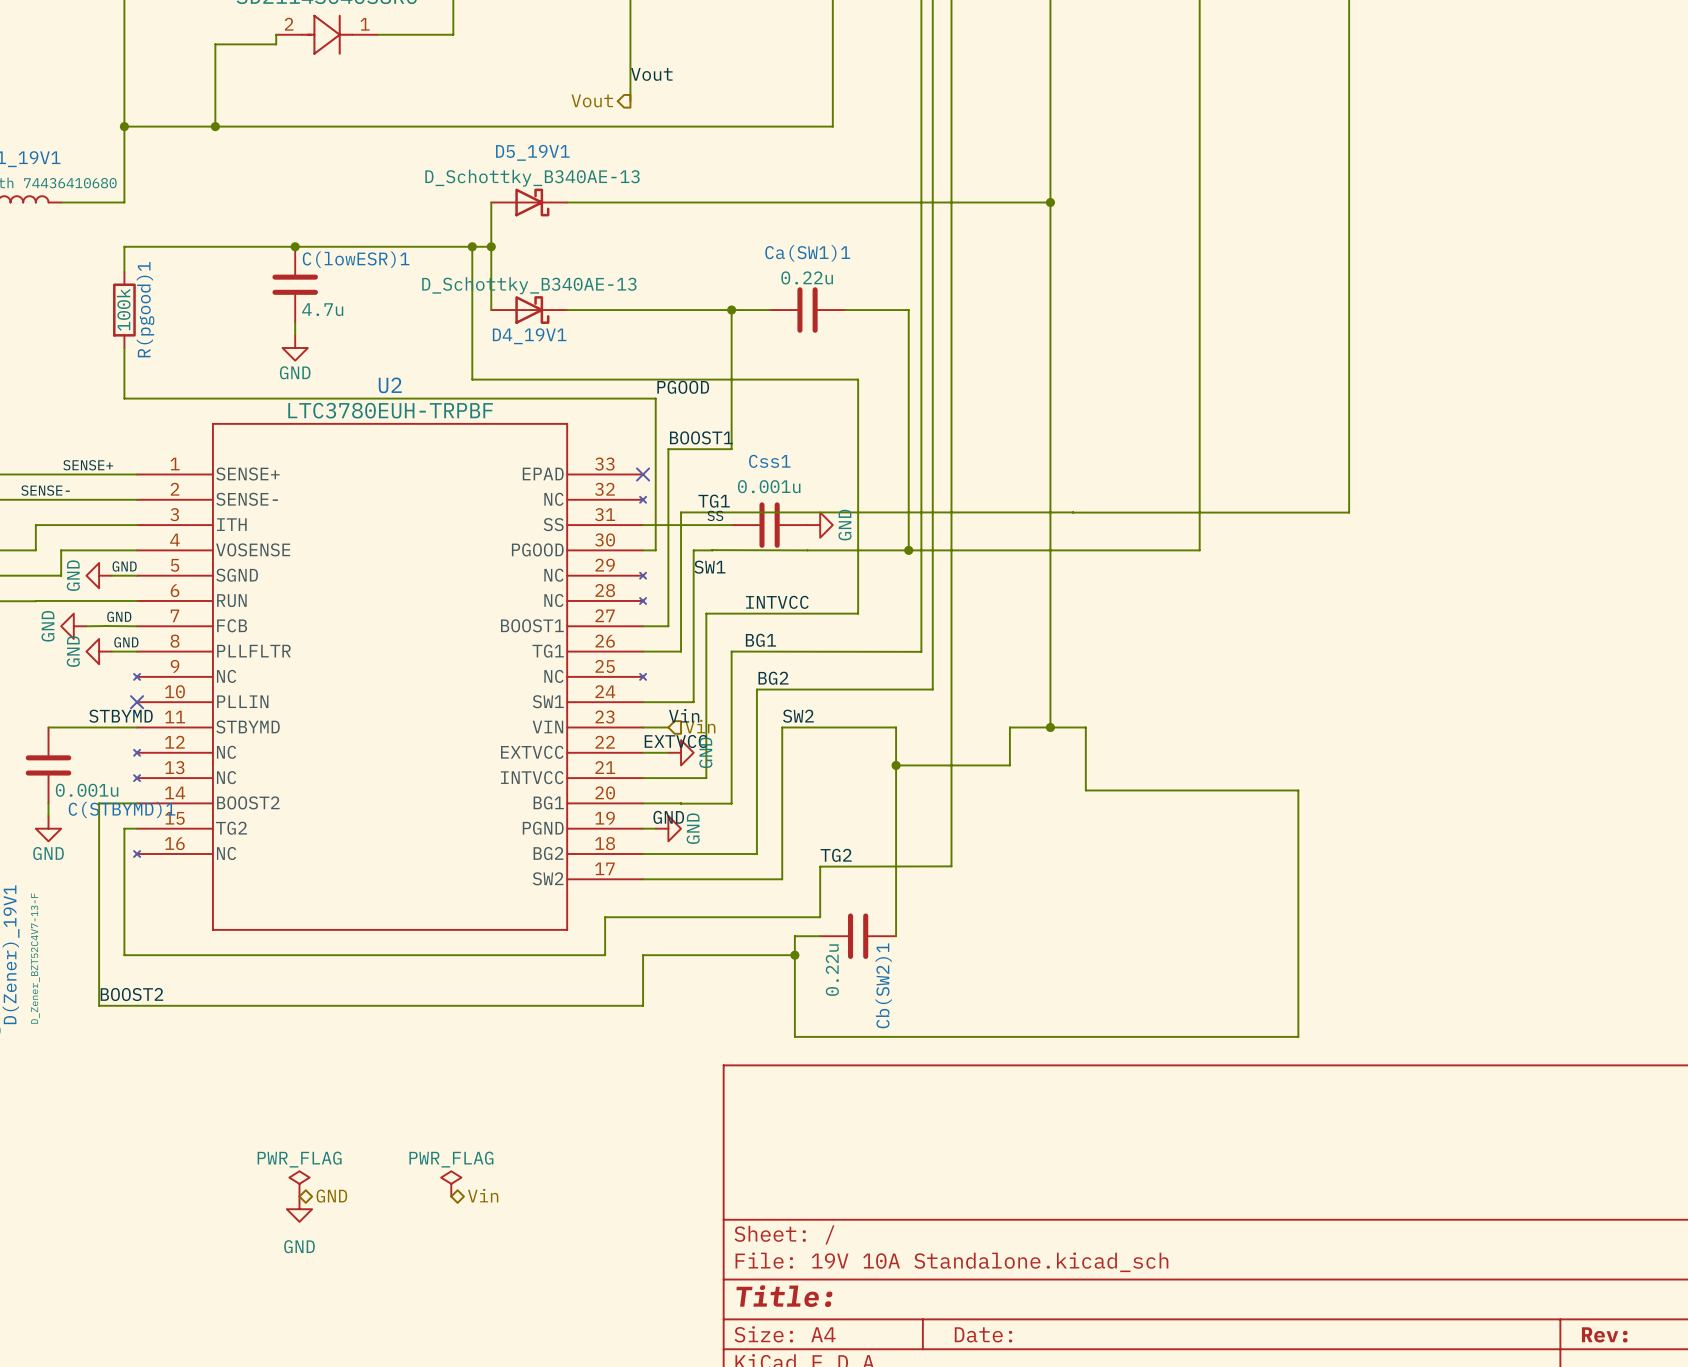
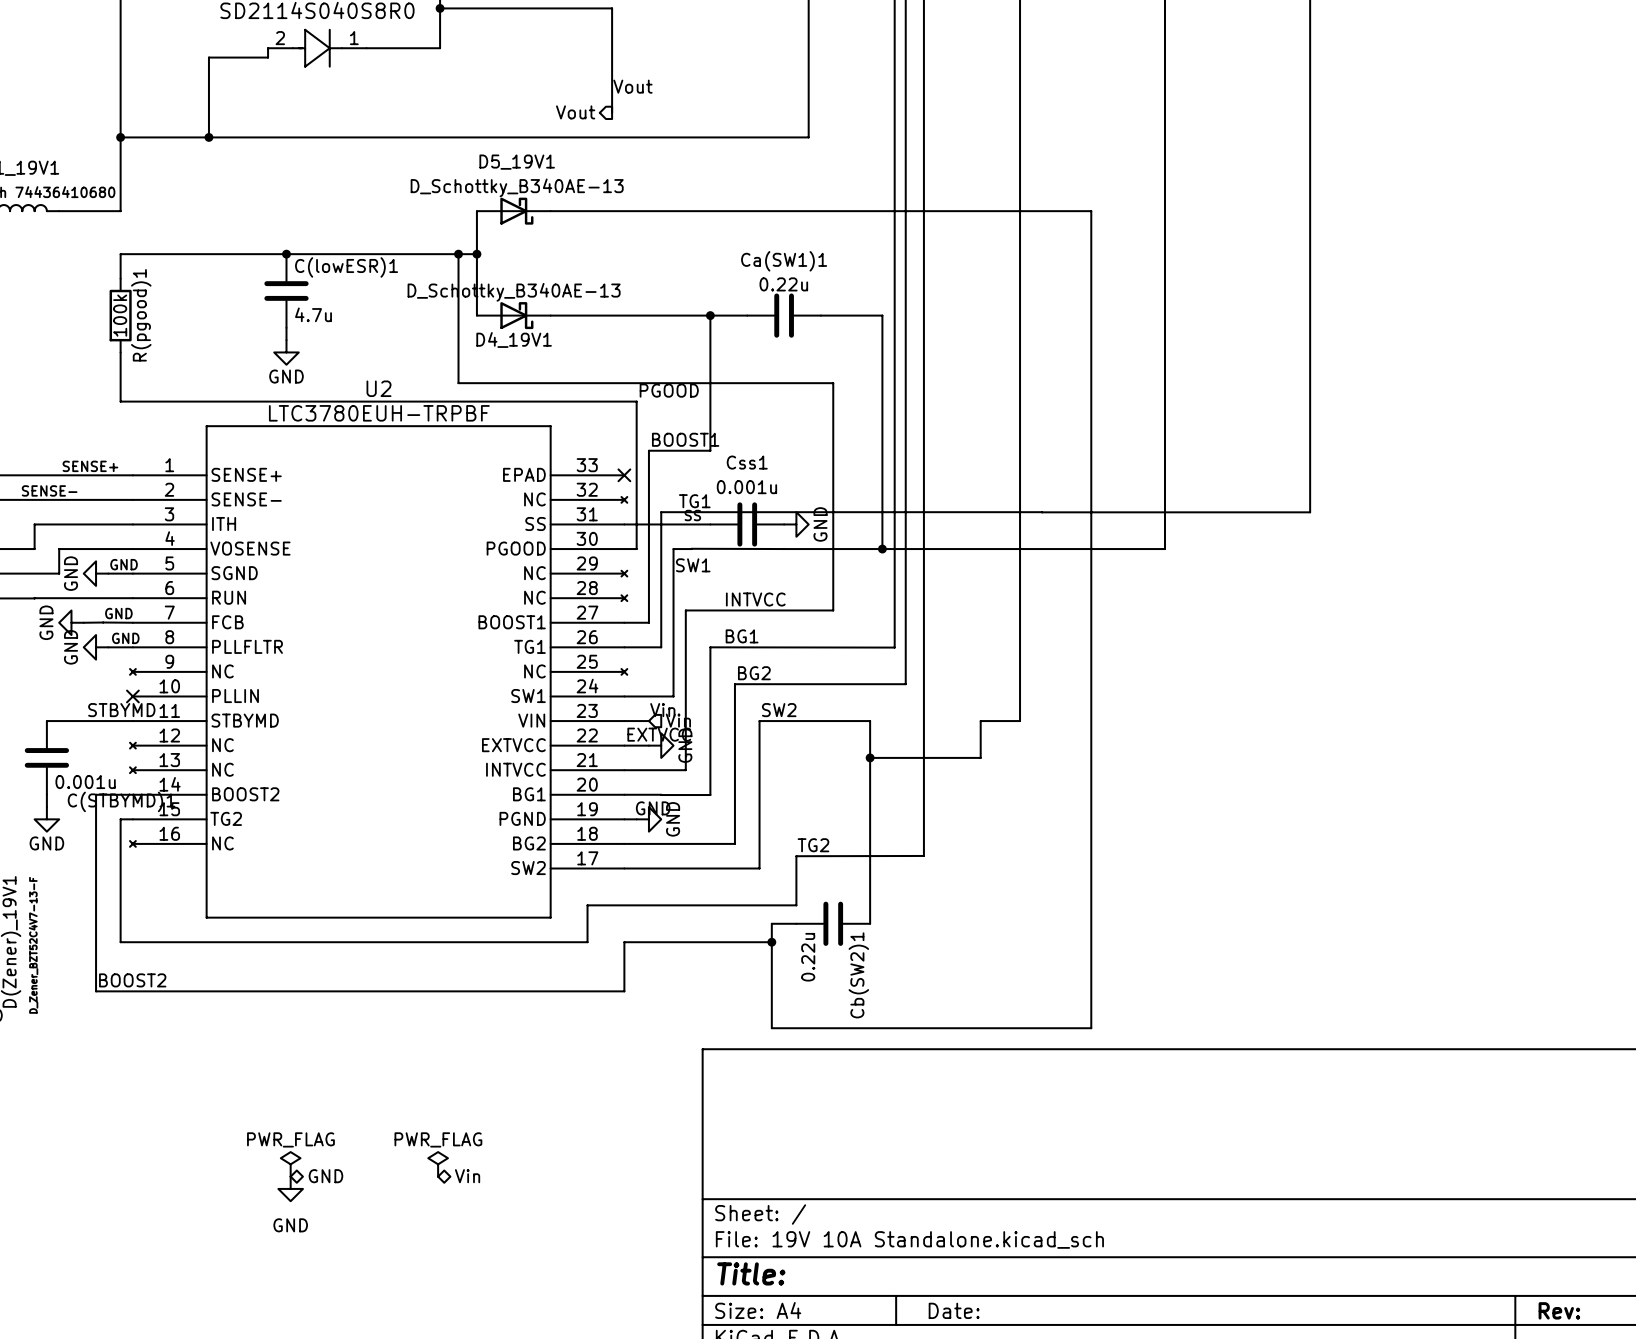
junction: (1050, 202) -> none
wire: (1050, 727) (1085, 727) (1085, 790) (1298, 790) (1298, 1036) (794, 1036) -> (1020, 211) (1091, 211) (1091, 1028) (771, 1028) (771, 1021)
junction: (1050, 727) -> none

